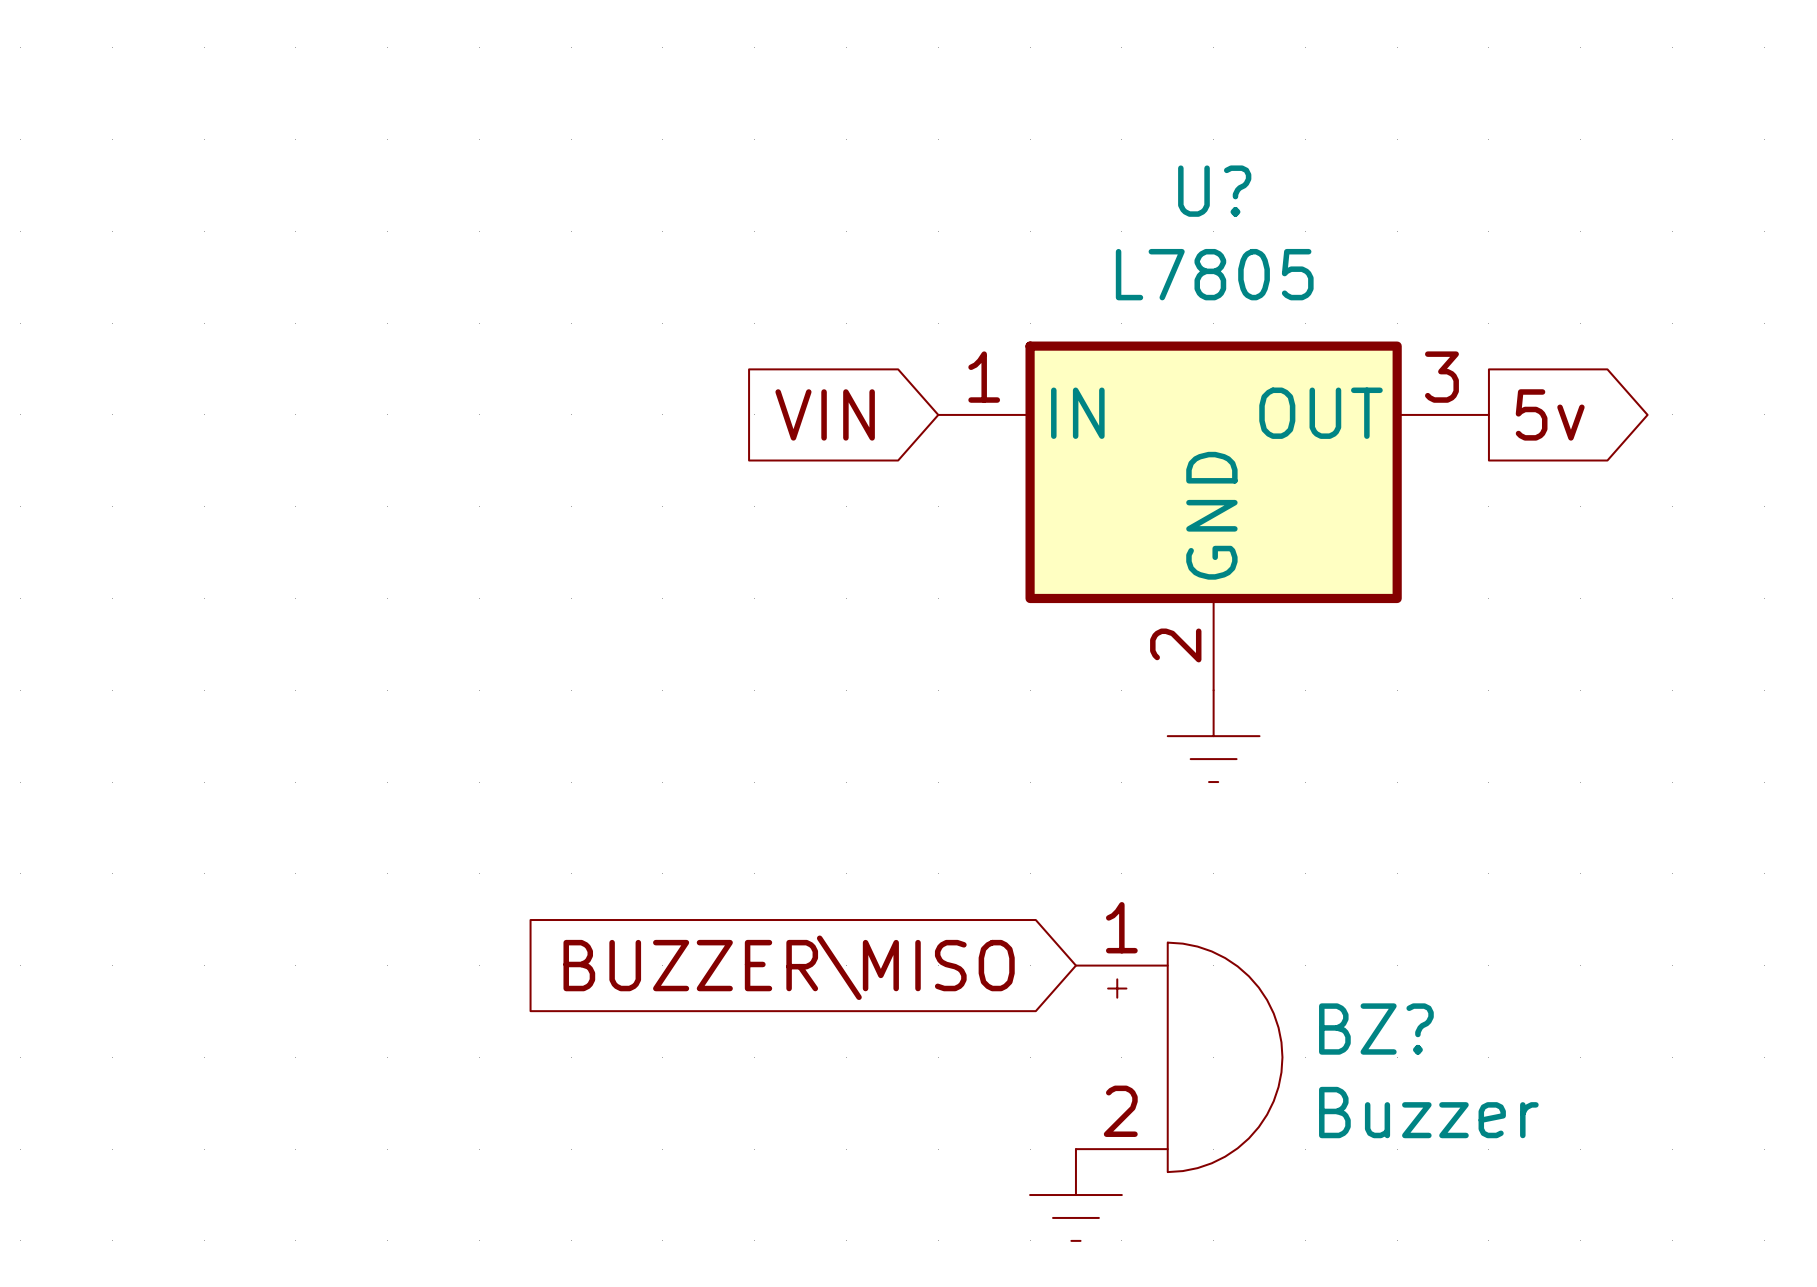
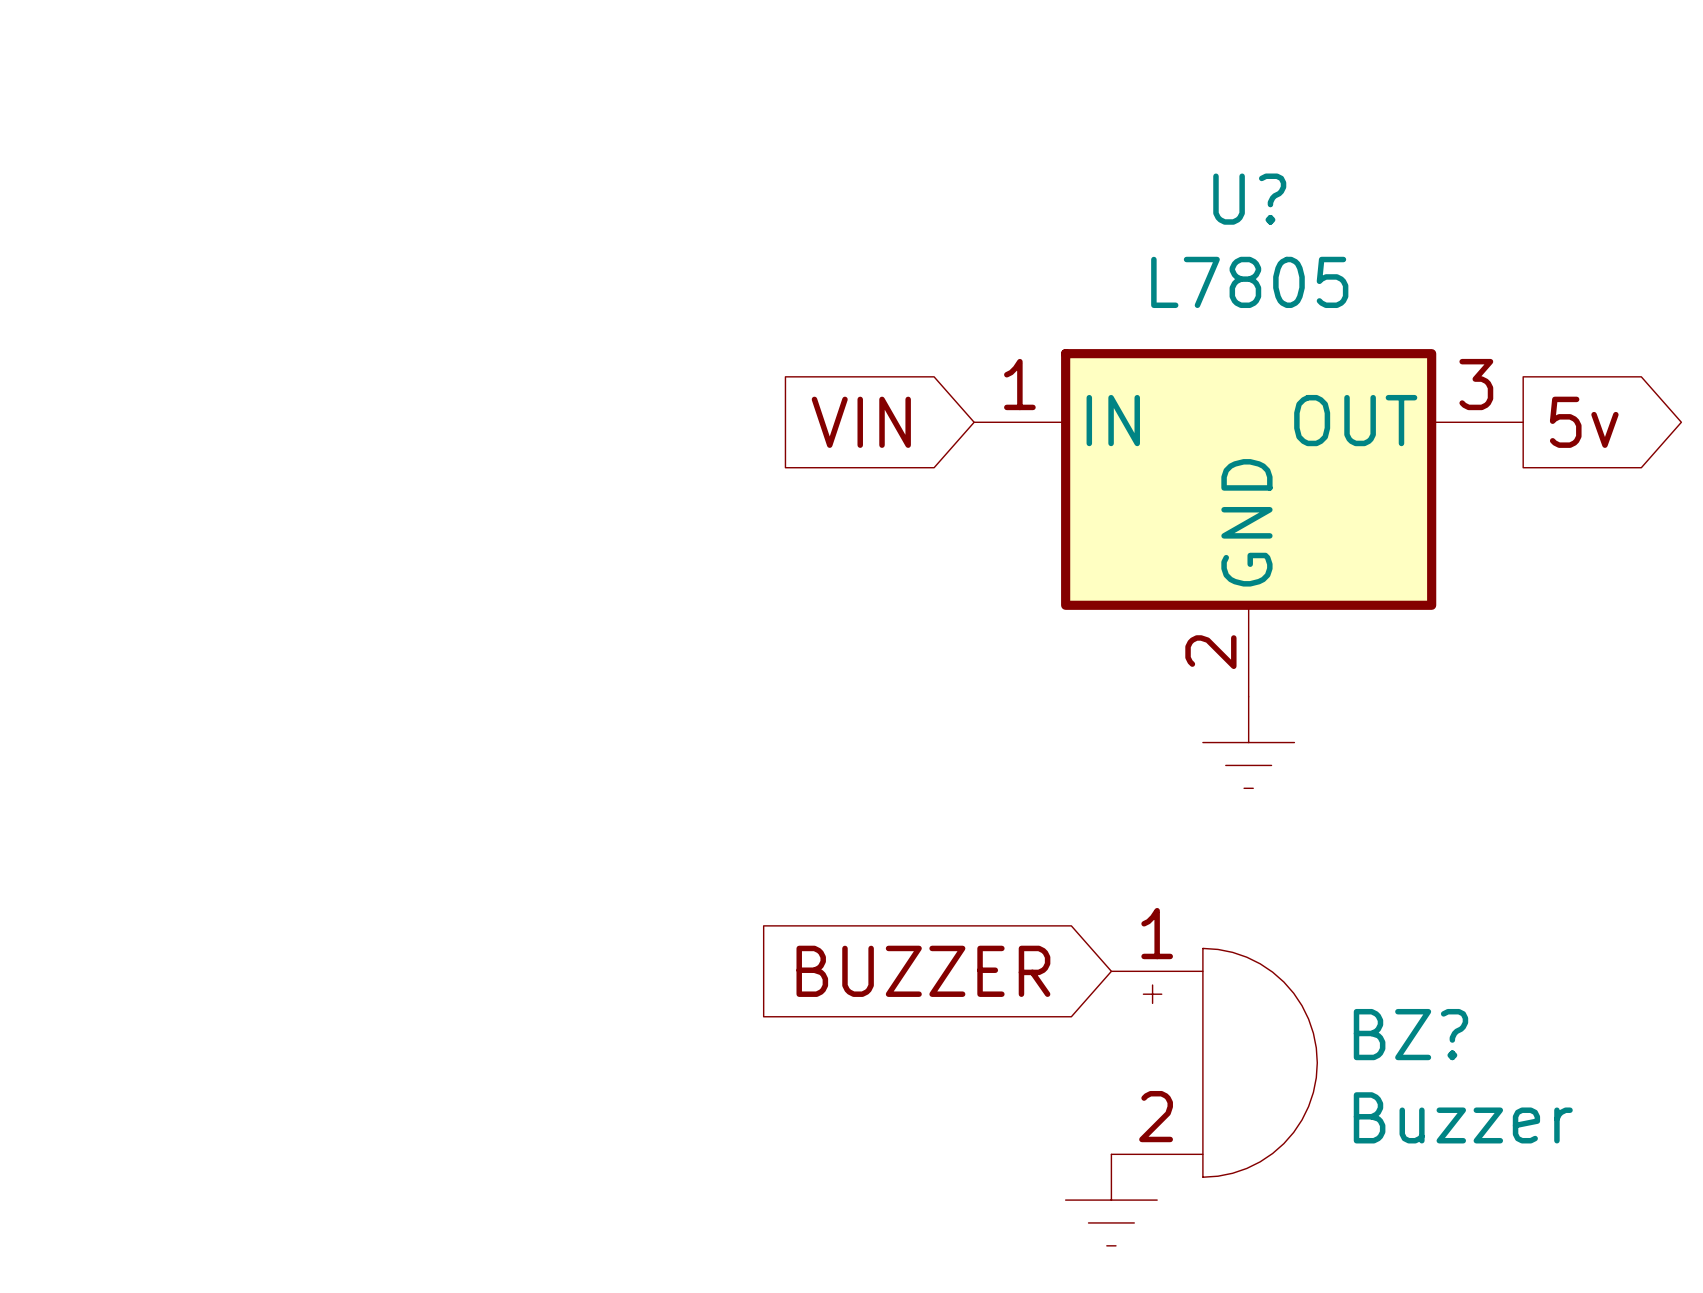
global label: BUZZER\MISO (789, 967) -> BUZZER (923, 971)

